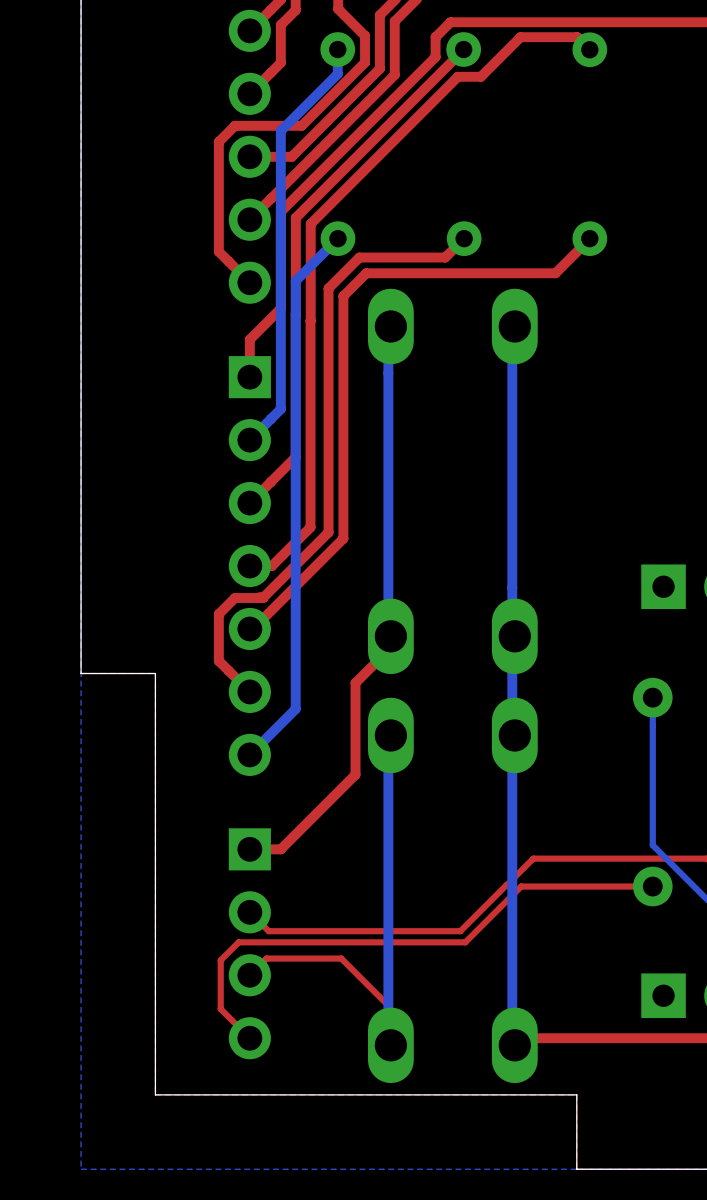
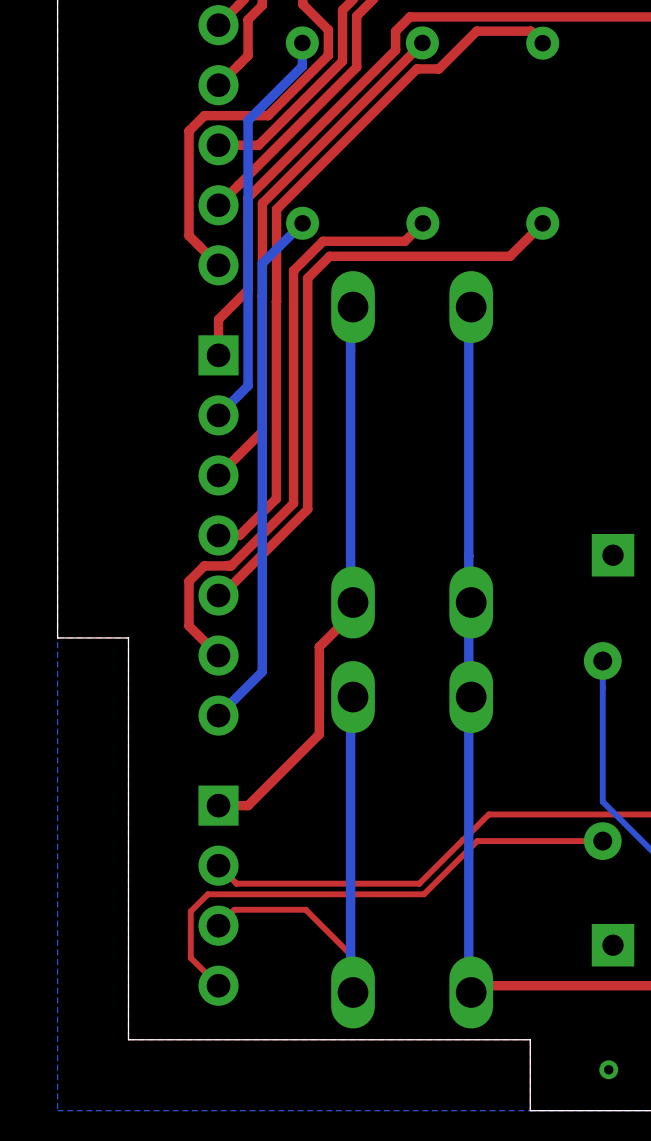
via: none -> (608, 1069)

